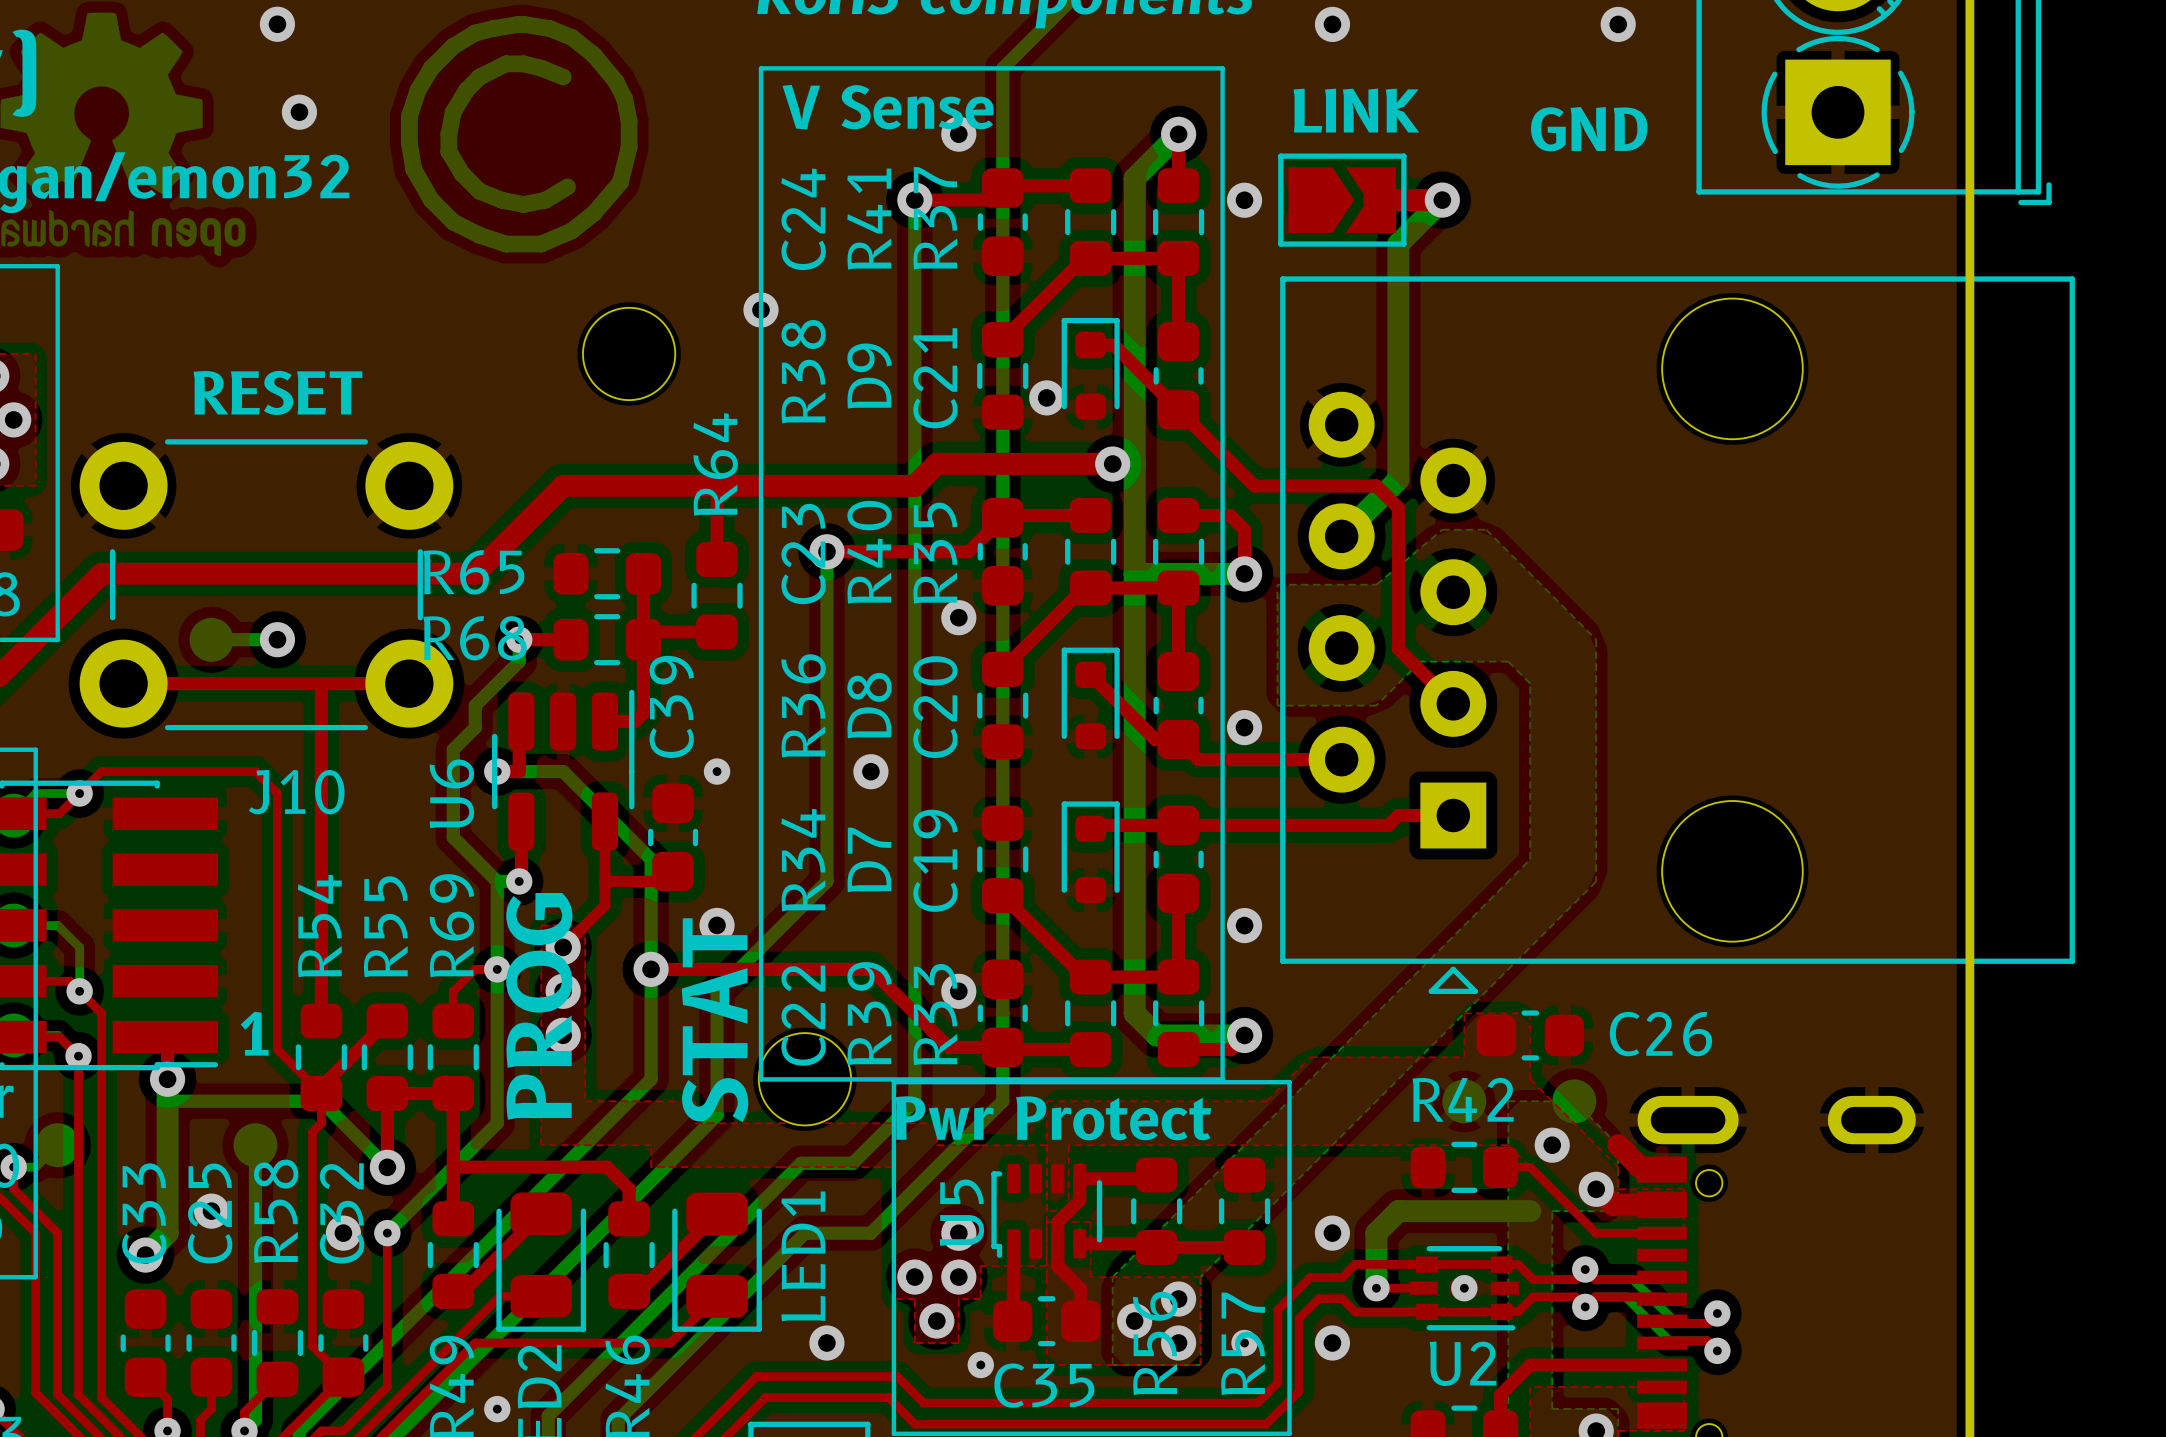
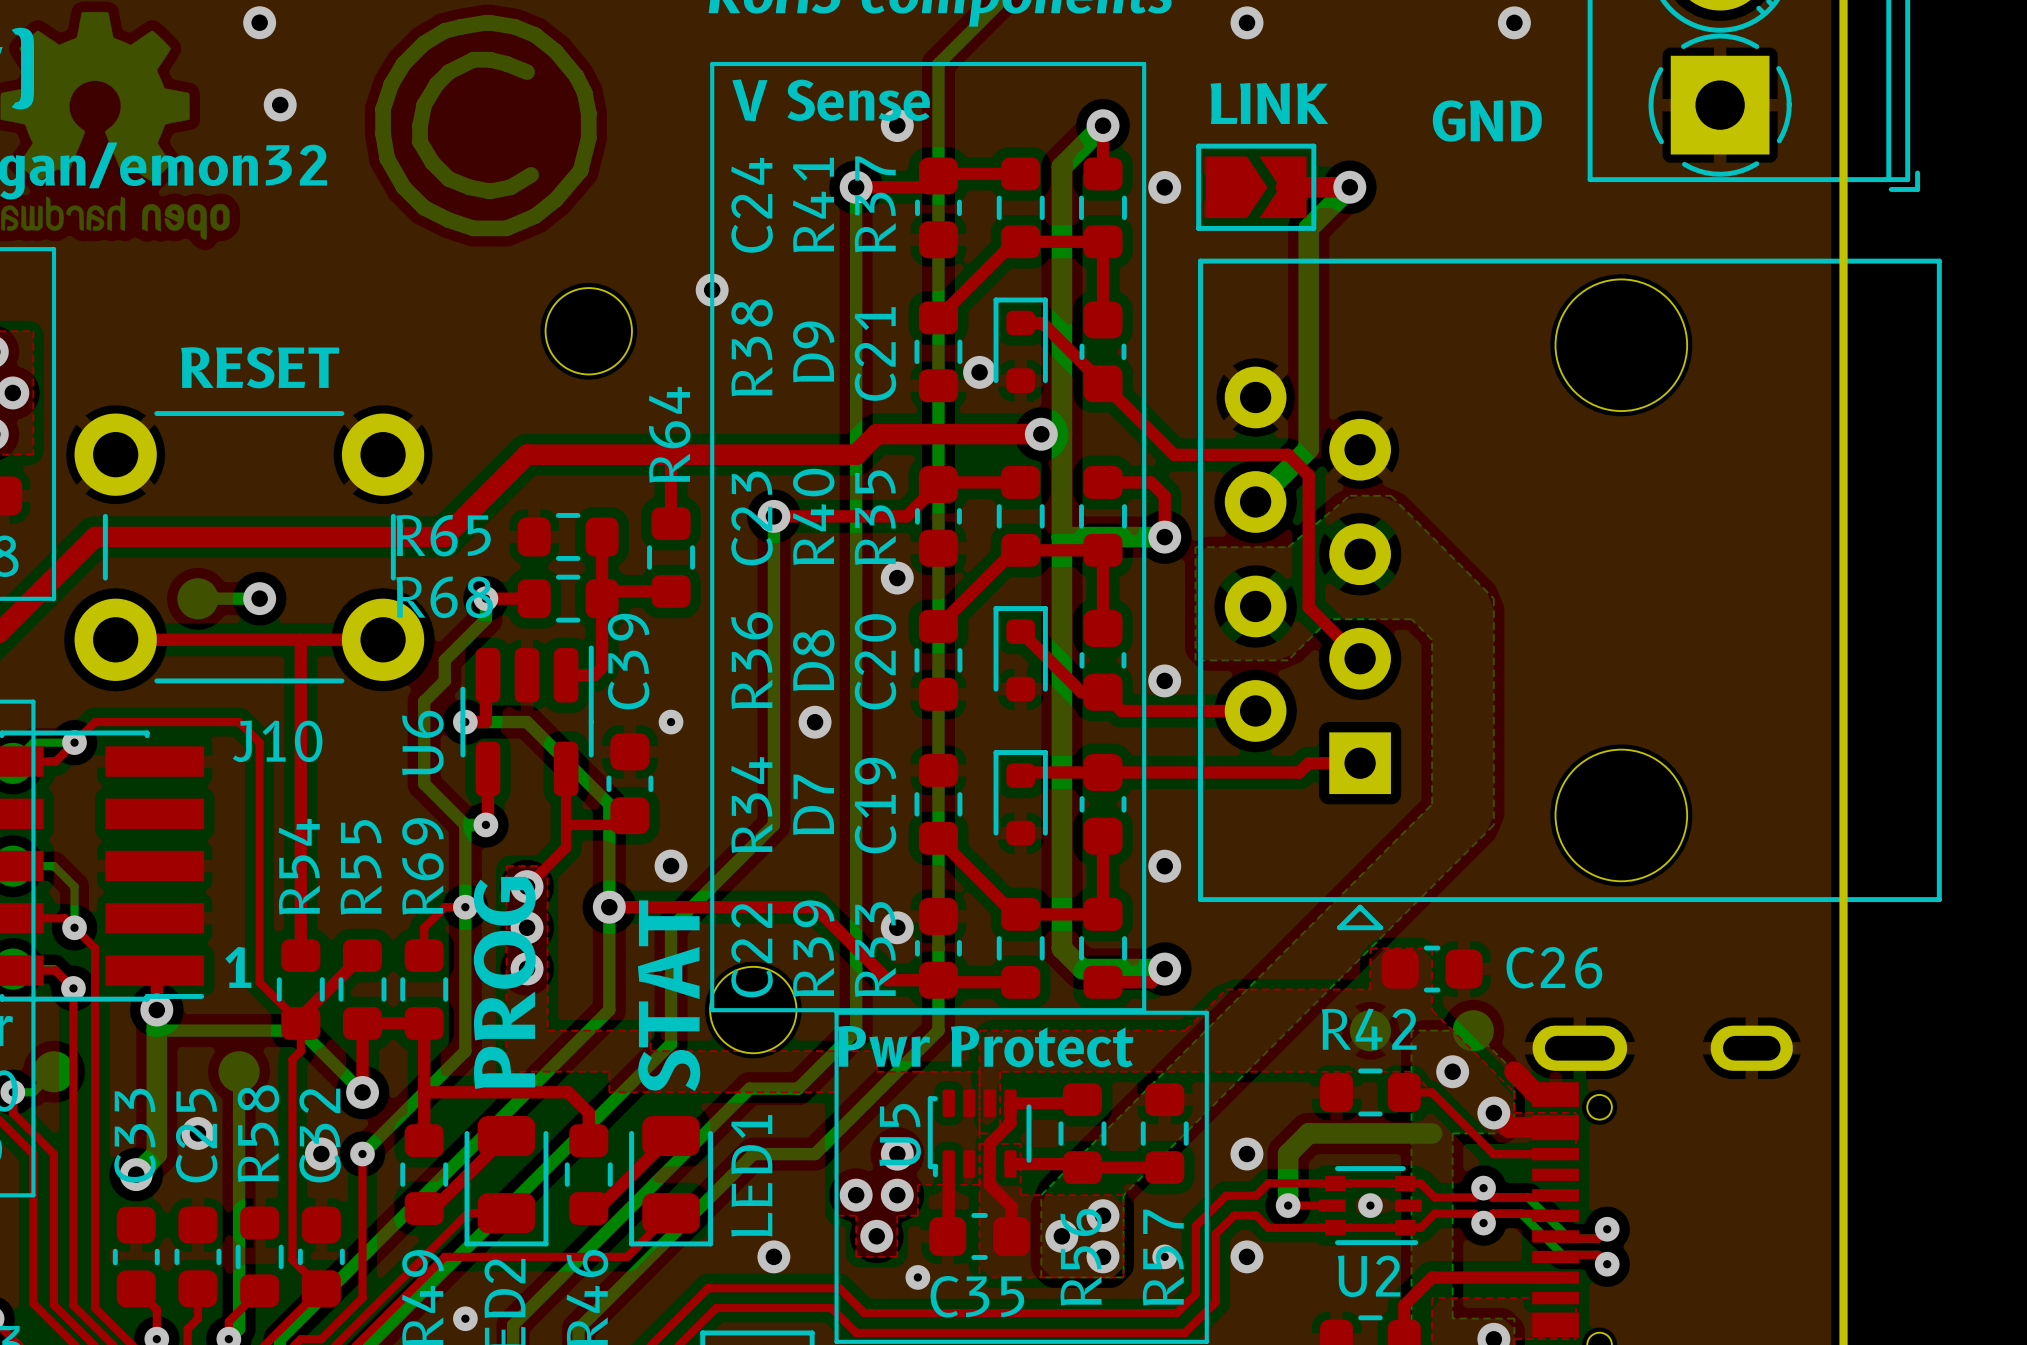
text position: PROG (539, 1006) -> PROG (504, 982)
text position: STAT (714, 1020) -> STAT (669, 995)

